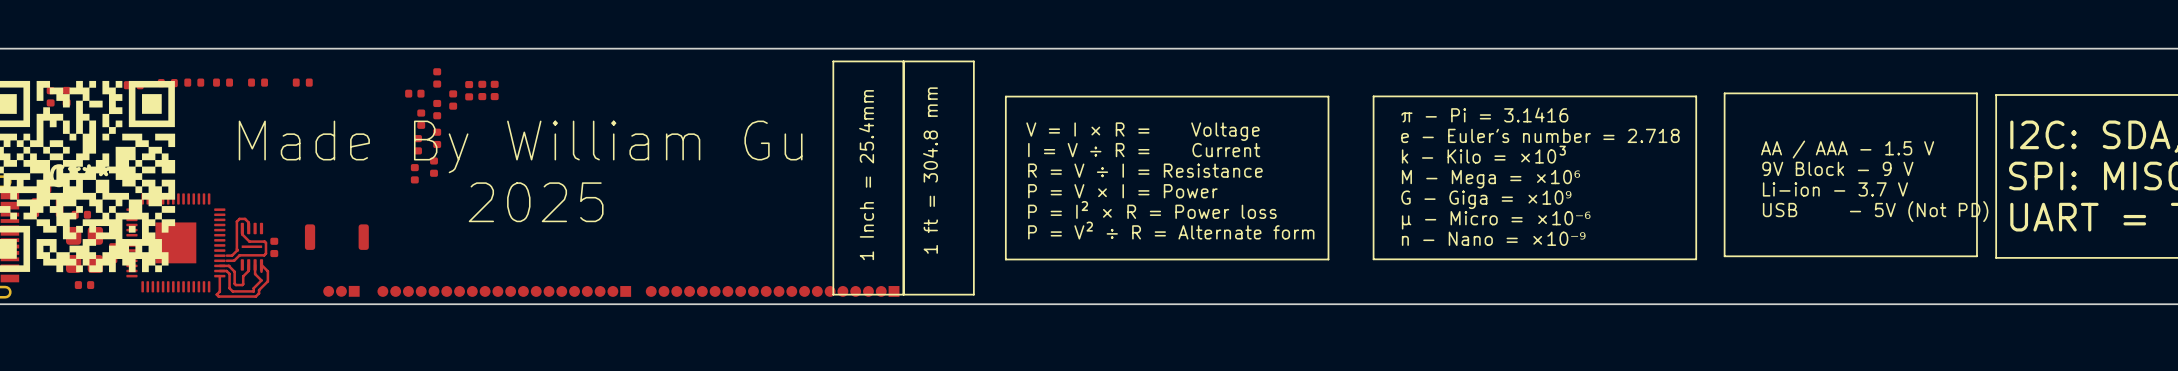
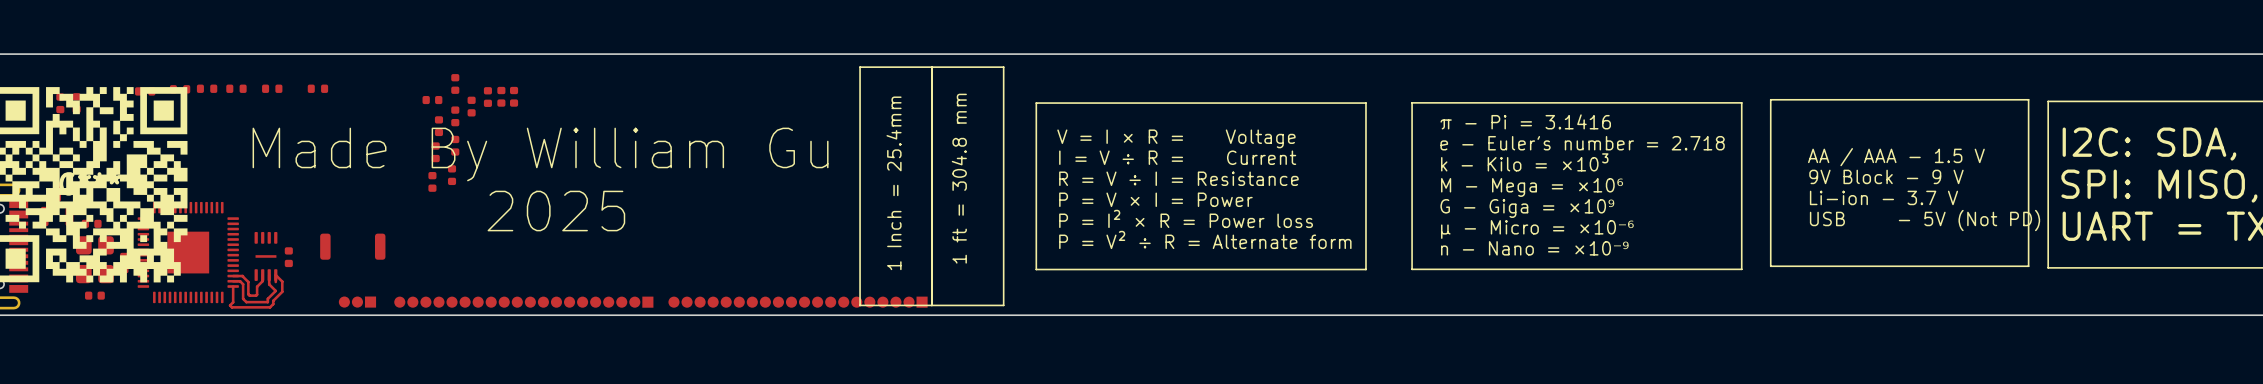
top track: (242, 228) (242, 234) (249, 241) (265, 242) (265, 253) (264, 255) (239, 255) (234, 260) (226, 260) -> none
top track: (248, 228) (248, 222) (245, 218) (239, 218) (236, 221) (237, 250) (232, 255) (226, 255) -> none

